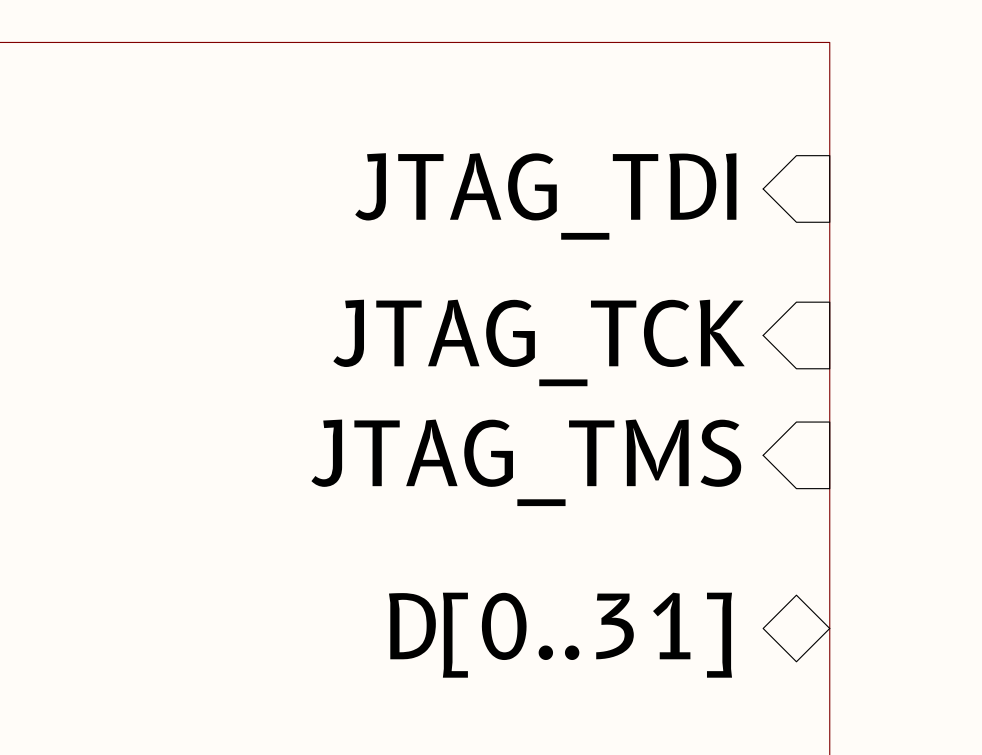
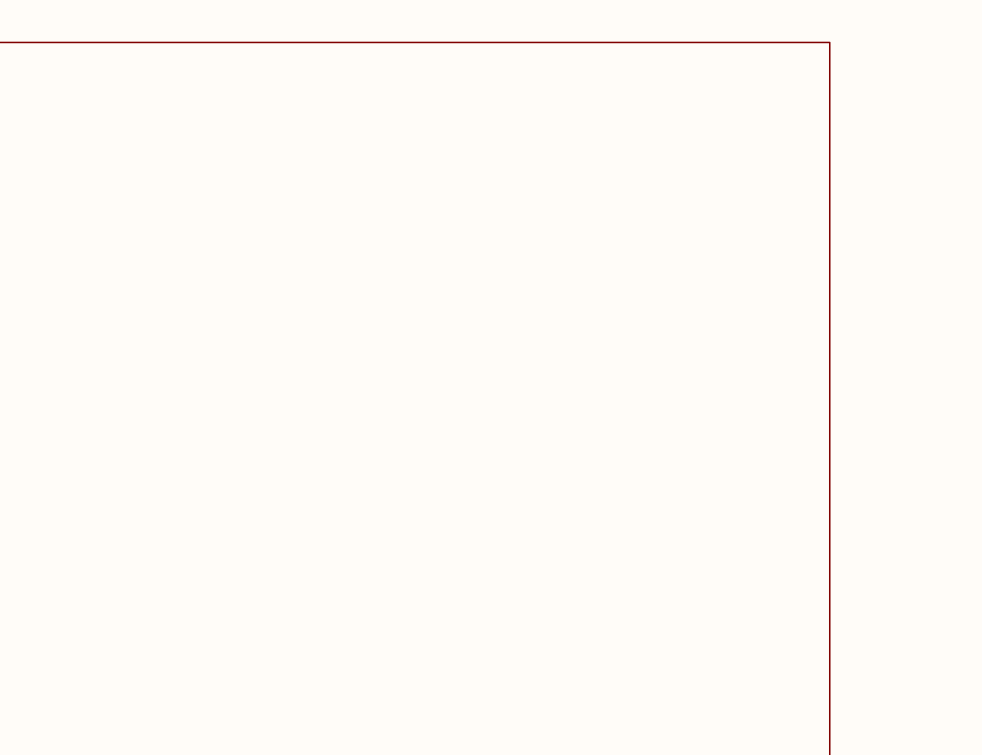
sheet pin: JTAG_TDI (545, 196) -> none
sheet pin: JTAG_TCK (539, 342) -> none
sheet pin: JTAG_TMS (526, 462) -> none
sheet pin: D[0..31] (560, 635) -> none

